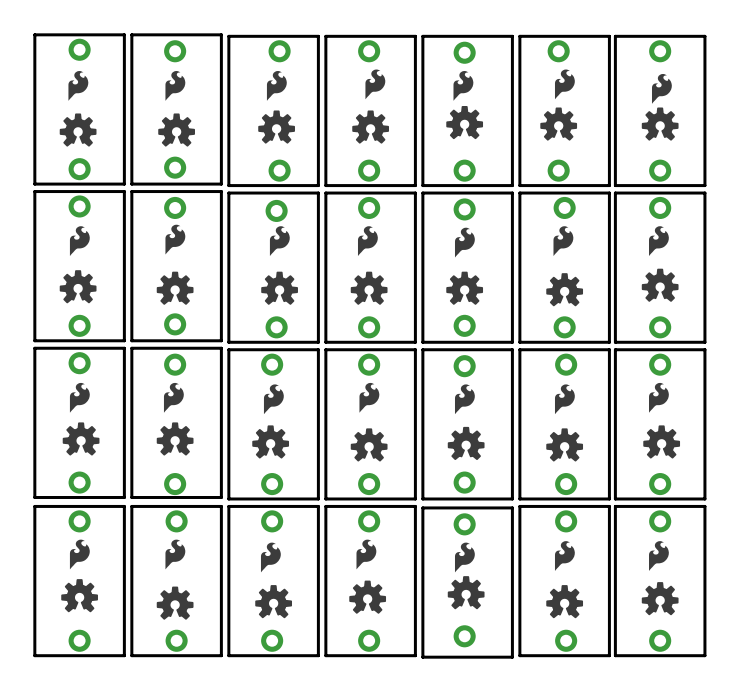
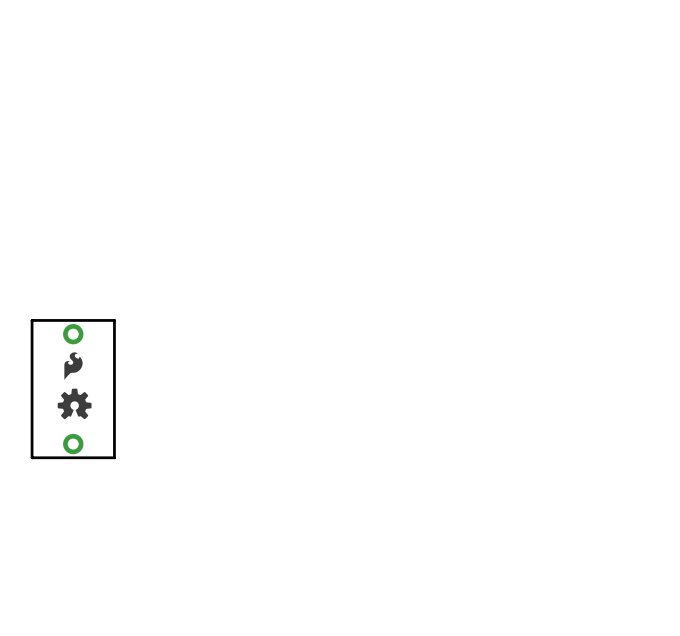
board edge: (124, 34) (124, 184) (34, 184) (34, 34) (124, 34) -> none
board edge: (221, 34) (221, 184) (131, 184) (131, 34) (221, 34) -> none
board edge: (318, 36) (318, 185) (228, 185) (228, 36) (318, 36) -> none
board edge: (415, 36) (415, 185) (325, 185) (325, 36) (415, 36) -> none
board edge: (512, 36) (512, 185) (422, 185) (422, 36) (512, 36) -> none
board edge: (609, 36) (609, 185) (519, 185) (519, 36) (609, 36) -> none
board edge: (704, 36) (704, 185) (615, 185) (615, 36) (704, 36) -> none
part: (79, 49) -> none
part: (175, 51) -> none
part: (279, 51) -> none
part: (369, 51) -> none
part: (558, 51) -> none
part: (660, 51) -> none
part: (464, 52) -> none
drawing: [352, 69, 390, 144] -> none
drawing: [540, 69, 578, 141] -> none
drawing: [59, 71, 97, 147] -> none
drawing: [158, 71, 195, 147] -> none
drawing: [258, 71, 295, 144] -> none
drawing: [446, 71, 484, 140] -> none
drawing: [641, 74, 679, 141] -> none
part: (175, 167) -> none
part: (79, 169) -> none
part: (279, 170) -> none
part: (369, 170) -> none
part: (464, 170) -> none
part: (558, 170) -> none
part: (660, 170) -> none
board edge: (124, 191) (124, 340) (34, 340) (34, 191) (124, 191) -> none
board edge: (221, 191) (221, 340) (131, 340) (131, 191) (221, 191) -> none
board edge: (318, 193) (318, 342) (228, 342) (228, 193) (318, 193) -> none
board edge: (415, 193) (415, 342) (325, 342) (325, 193) (415, 193) -> none
board edge: (512, 193) (512, 342) (422, 342) (422, 193) (512, 193) -> none
board edge: (609, 193) (609, 342) (519, 342) (519, 193) (609, 193) -> none
board edge: (704, 193) (704, 342) (615, 342) (615, 193) (704, 193) -> none
part: (79, 206) -> none
part: (175, 207) -> none
part: (369, 207) -> none
part: (564, 207) -> none
part: (660, 207) -> none
part: (464, 209) -> none
part: (276, 210) -> none
drawing: [165, 224, 186, 255] -> none
drawing: [59, 226, 97, 304] -> none
drawing: [269, 226, 290, 257] -> none
drawing: [357, 226, 378, 257] -> none
drawing: [553, 226, 574, 257] -> none
drawing: [641, 226, 679, 302] -> none
drawing: [446, 227, 484, 305] -> none
drawing: [156, 271, 194, 305] -> none
drawing: [261, 271, 298, 305] -> none
drawing: [350, 271, 388, 305] -> none
drawing: [546, 273, 584, 307] -> none
part: (175, 324) -> none
part: (79, 325) -> none
part: (464, 325) -> none
part: (276, 327) -> none
part: (369, 327) -> none
part: (564, 327) -> none
part: (660, 327) -> none
board edge: (221, 348) (221, 497) (131, 497) (131, 348) (221, 348) -> none
board edge: (318, 349) (228, 349) (228, 498) (318, 498) (318, 349) -> none
board edge: (415, 349) (325, 349) (325, 498) (415, 498) (415, 349) -> none
board edge: (512, 349) (422, 349) (422, 498) (512, 498) (512, 349) -> none
board edge: (609, 349) (519, 349) (519, 498) (609, 498) (609, 349) -> none
board edge: (704, 349) (704, 498) (615, 498) (615, 349) (704, 349) -> none
part: (175, 364) -> none
part: (272, 364) -> none
part: (369, 364) -> none
part: (566, 364) -> none
part: (660, 364) -> none
part: (464, 366) -> none
drawing: [156, 382, 194, 456] -> none
drawing: [359, 382, 380, 413] -> none
drawing: [643, 382, 681, 459] -> none
drawing: [252, 384, 290, 459] -> none
drawing: [447, 384, 485, 461] -> none
drawing: [546, 384, 584, 462] -> none
drawing: [350, 428, 388, 462] -> none
part: (464, 482) -> none
part: (175, 484) -> none
part: (272, 484) -> none
part: (369, 484) -> none
part: (566, 484) -> none
part: (660, 484) -> none
board edge: (124, 506) (34, 506) (34, 655) (124, 655) (124, 506) -> none
board edge: (221, 506) (131, 506) (131, 655) (221, 655) (221, 506) -> none
board edge: (318, 506) (228, 506) (228, 655) (318, 655) (318, 506) -> none
board edge: (415, 506) (325, 506) (325, 655) (415, 655) (415, 506) -> none
board edge: (609, 506) (519, 506) (519, 655) (609, 655) (609, 506) -> none
board edge: (704, 506) (704, 655) (615, 655) (615, 506) (704, 506) -> none
board edge: (512, 507) (512, 657) (422, 657) (422, 507) (512, 507) -> none
part: (79, 521) -> none
part: (176, 521) -> none
part: (272, 521) -> none
part: (369, 521) -> none
part: (566, 521) -> none
part: (660, 521) -> none
part: (464, 524) -> none
drawing: [61, 539, 98, 613] -> none
drawing: [165, 539, 186, 570] -> none
drawing: [349, 539, 387, 614] -> none
drawing: [546, 541, 584, 619] -> none
drawing: [641, 541, 679, 616] -> none
drawing: [255, 542, 293, 619] -> none
drawing: [447, 542, 485, 610] -> none
drawing: [156, 586, 194, 620] -> none
part: (464, 636) -> none
part: (79, 640) -> none
part: (176, 640) -> none
part: (272, 640) -> none
part: (369, 640) -> none
part: (566, 640) -> none
part: (660, 640) -> none

